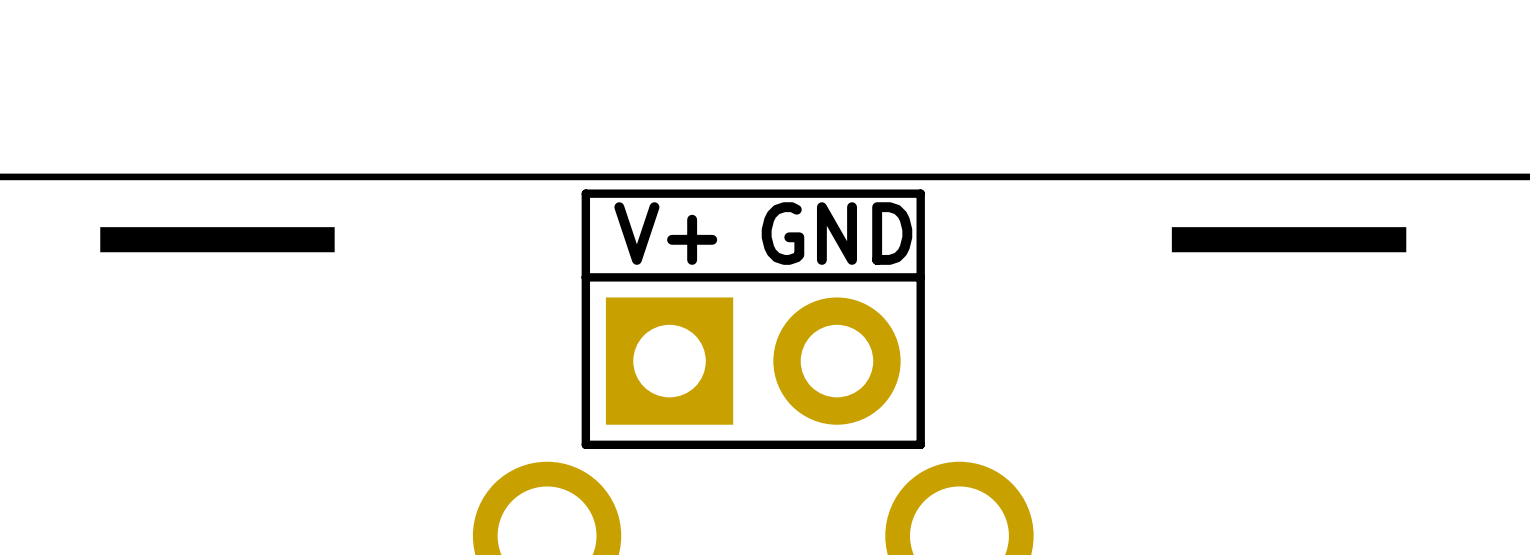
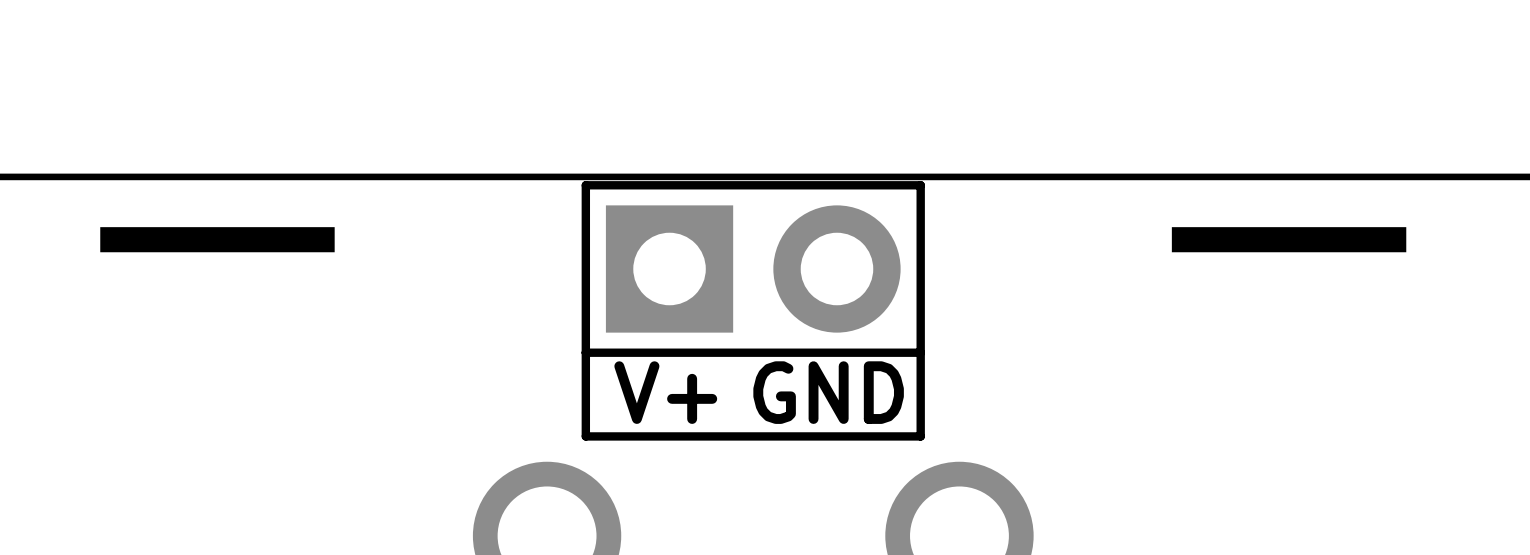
part footprint: [581, 189, 925, 449] -> [581, 181, 925, 441]

